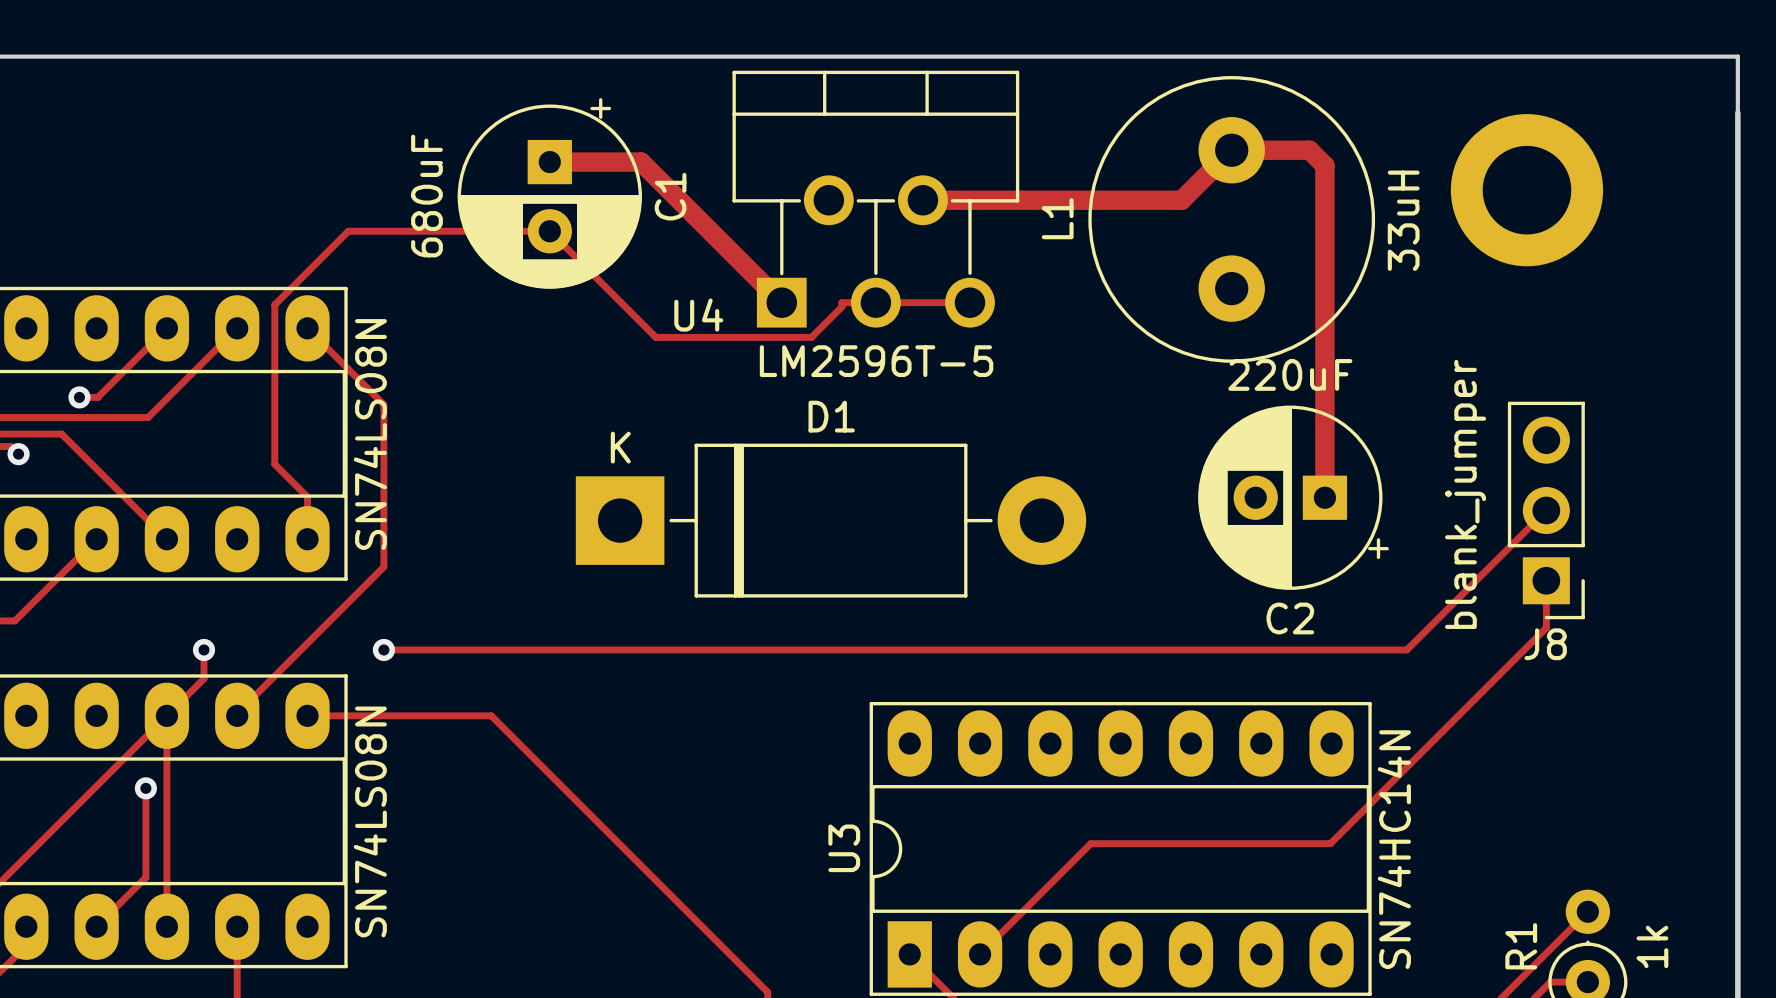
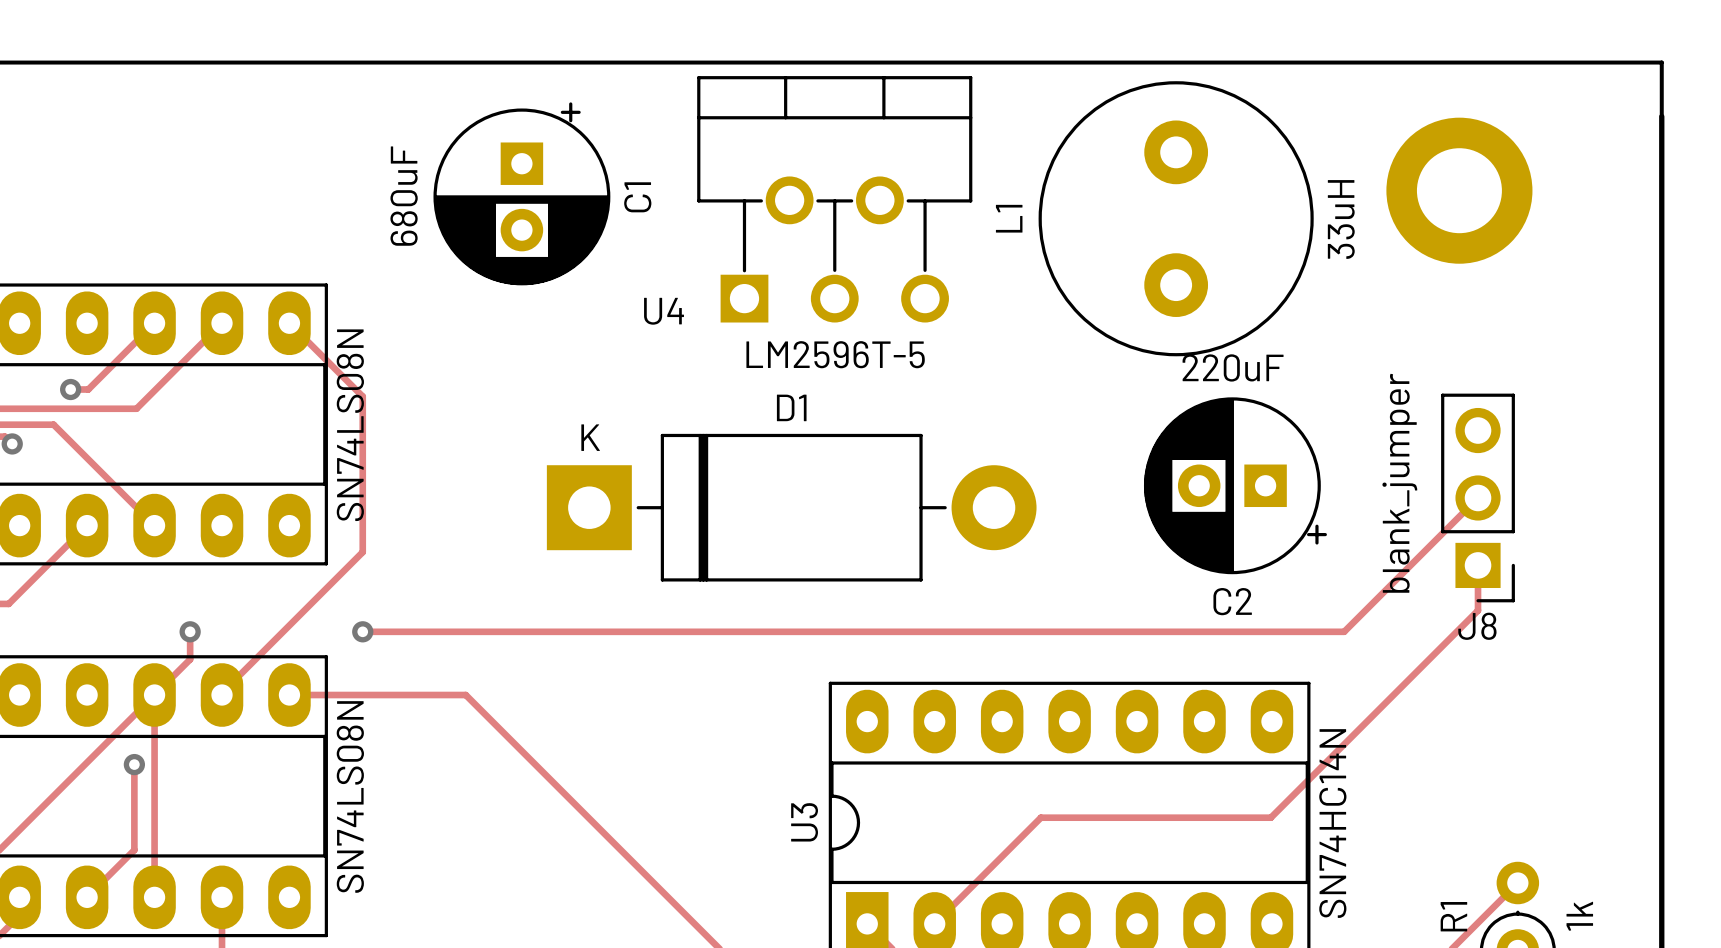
track: (549, 162) (641, 162) (781, 302) -> none
track: (922, 200) (1181, 200) (1231, 150) (1309, 150) (1324, 165) (1324, 497) -> none
track: (970, 302) (841, 302) (841, 306) (811, 337) (655, 337) (549, 231) (348, 231) (274, 304) (274, 464) (307, 497) (307, 539) -> none

